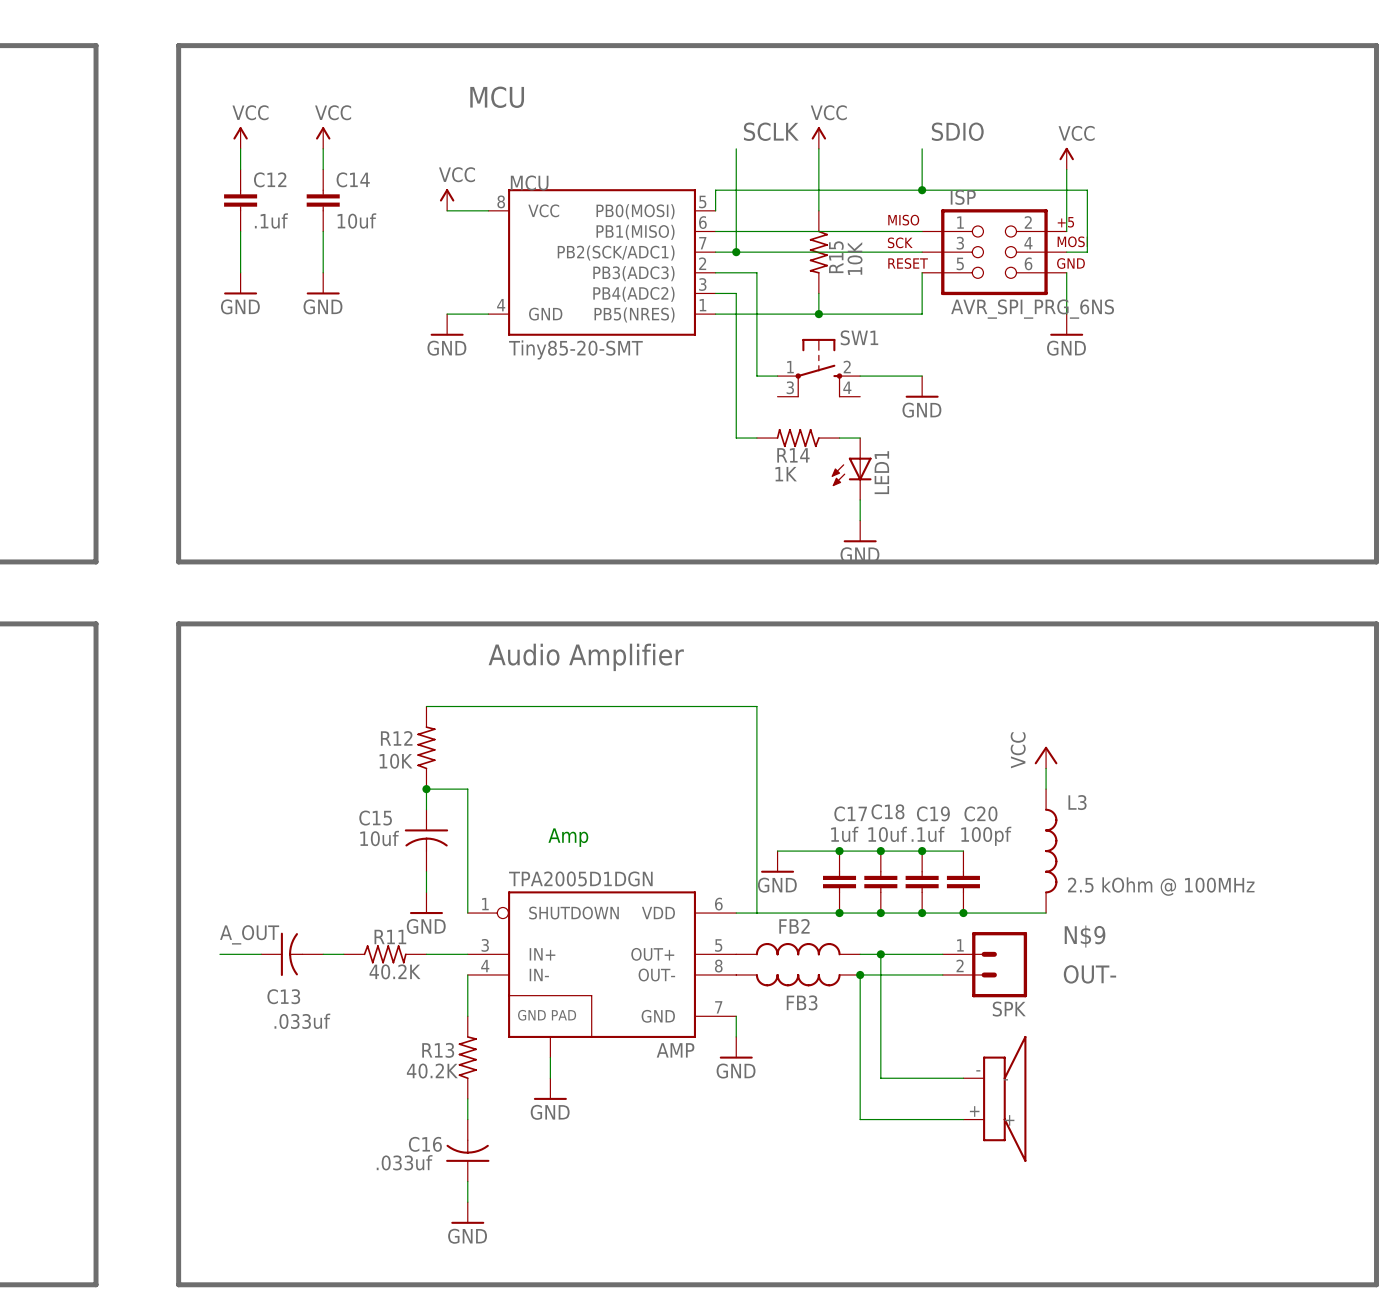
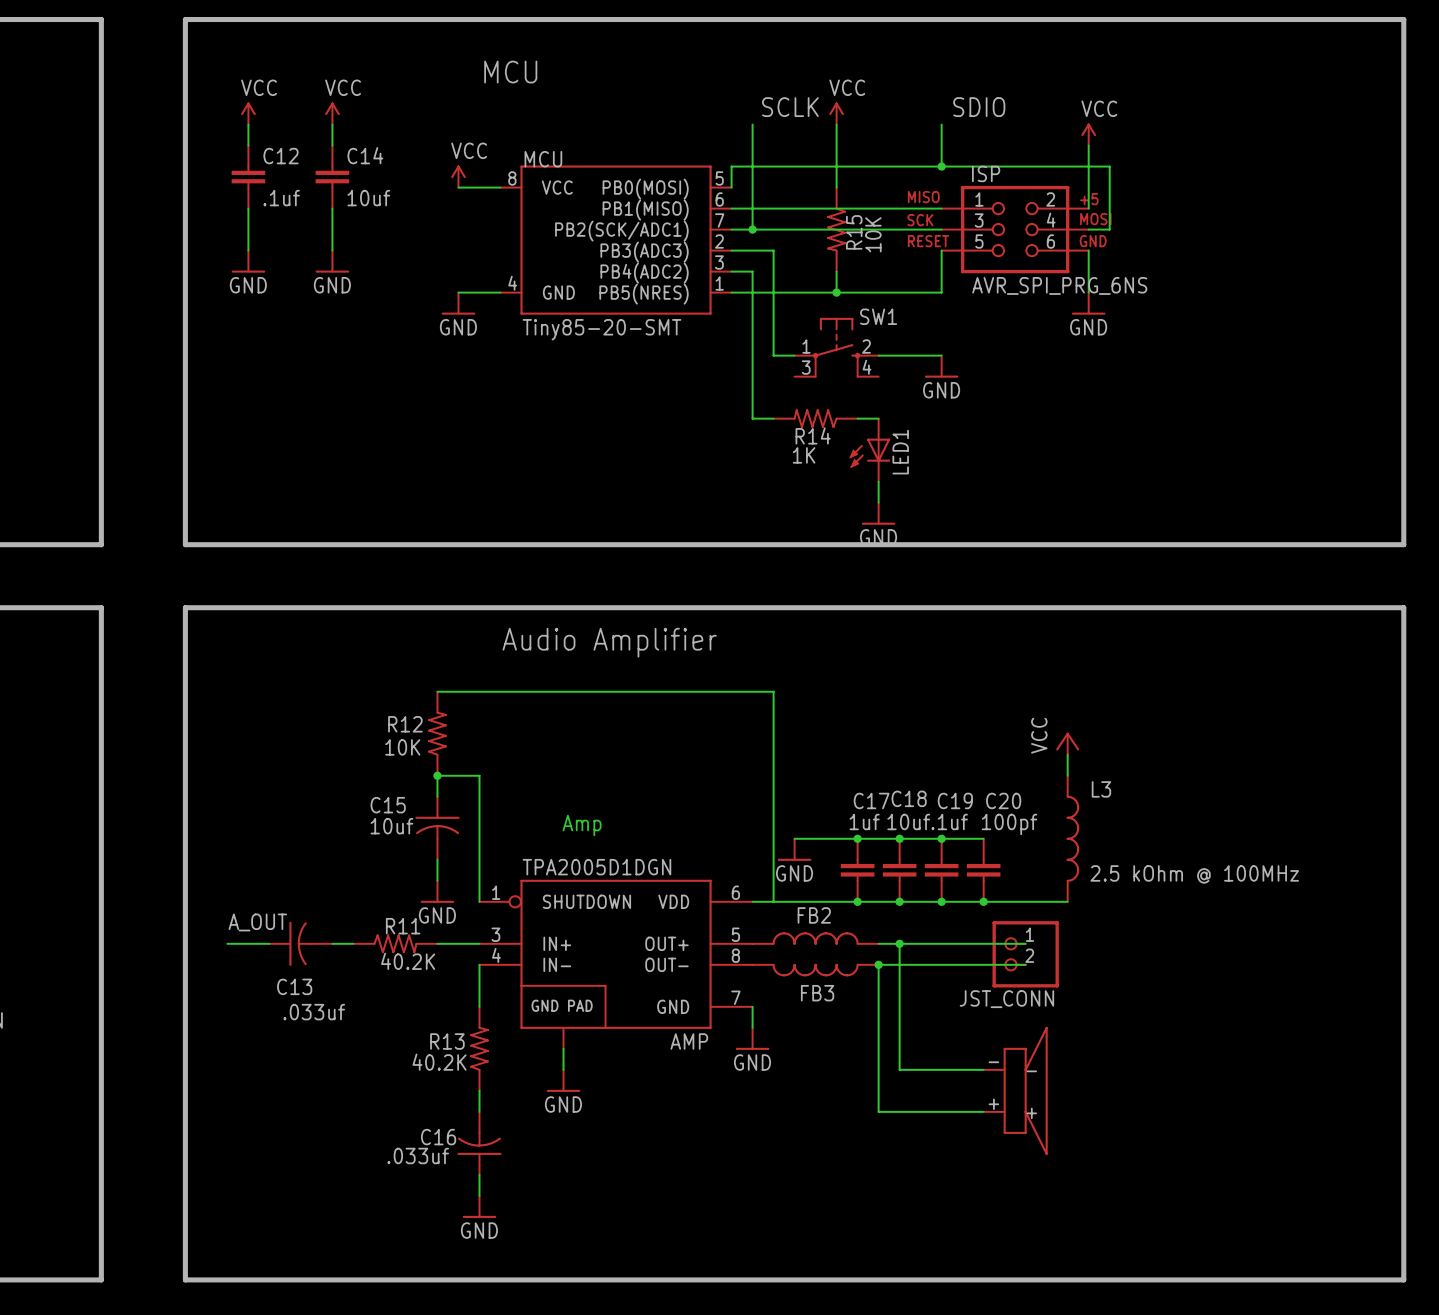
label: N$9 (1085, 936) -> none
SPK: (984, 964) -> none
JST_CONN: none -> (1025, 954)
label: OUT- (1089, 974) -> none

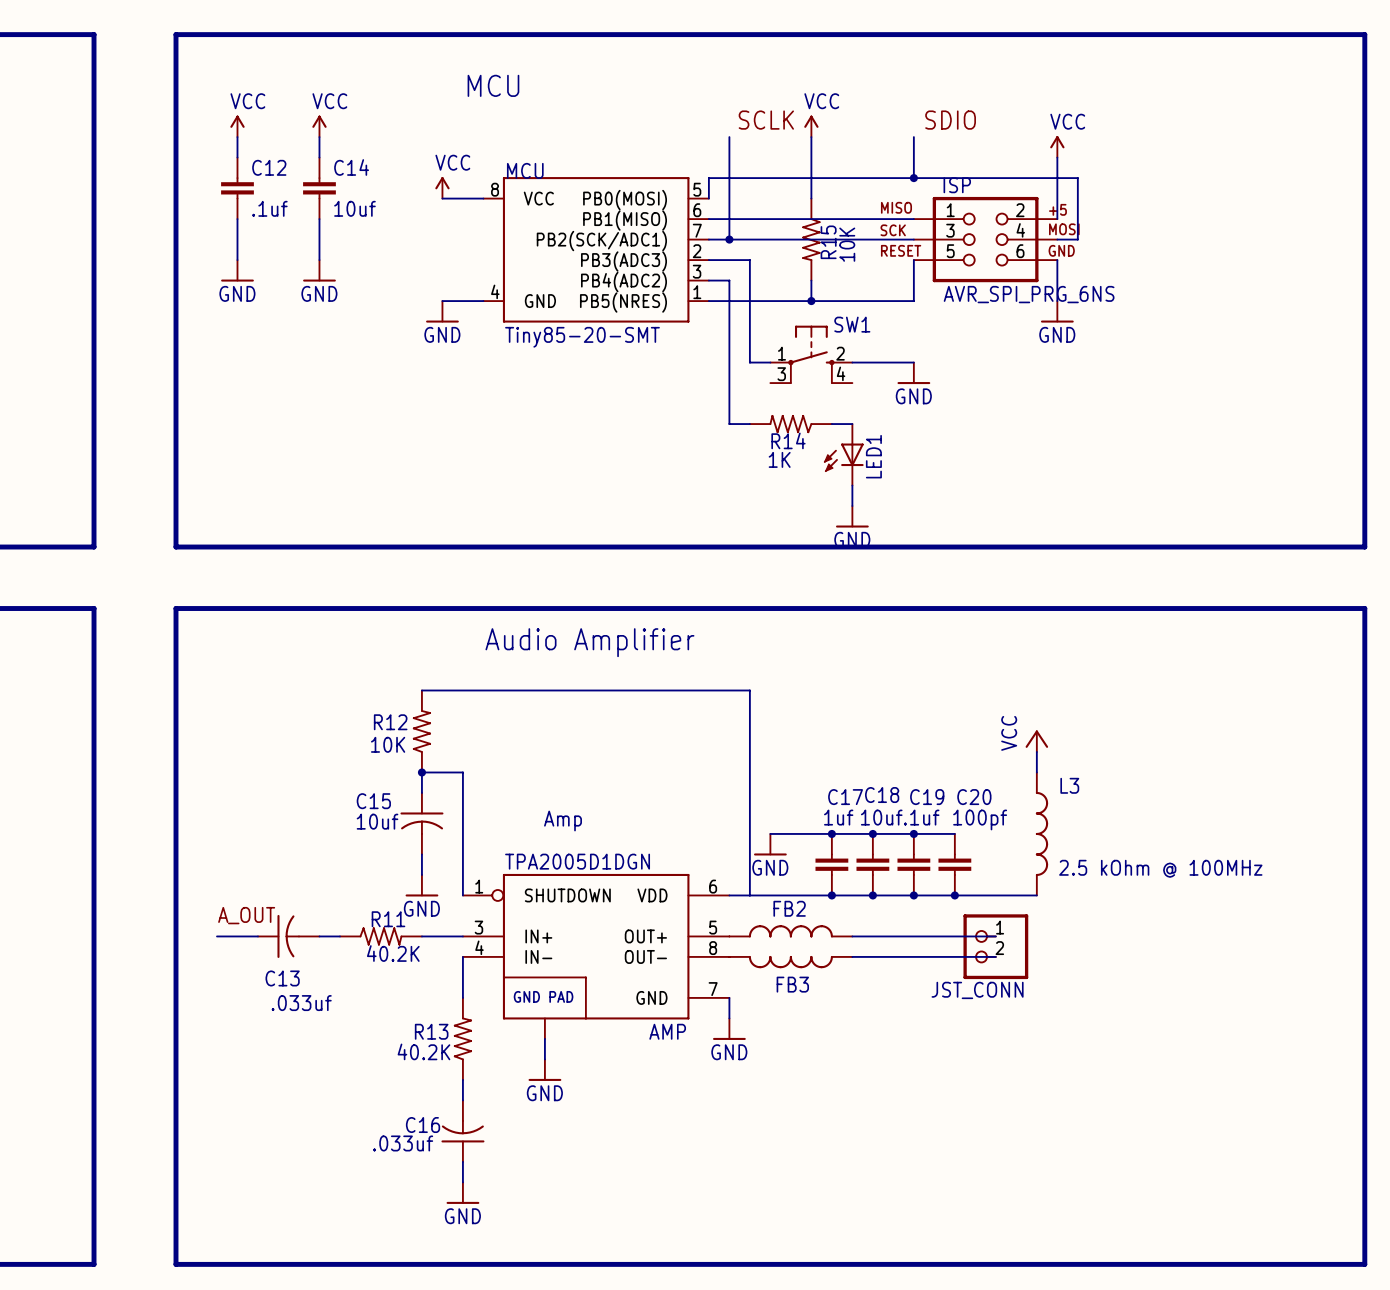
wire: (899, 943) (899, 1069) (983, 1069) -> none
junction: (899, 943) -> none
wire: (878, 964) (878, 1111) (983, 1111) -> none
junction: (878, 964) -> none
part: (1015, 1090) -> none

